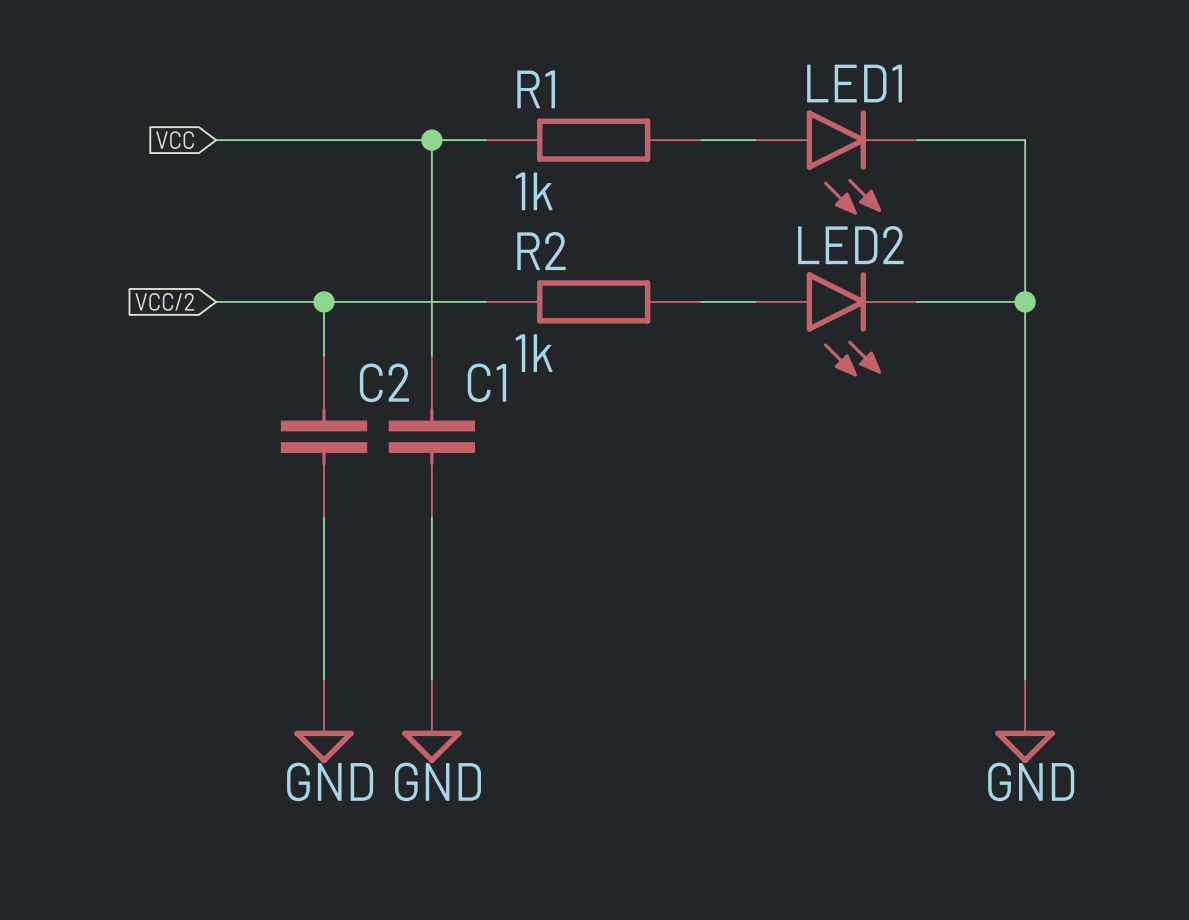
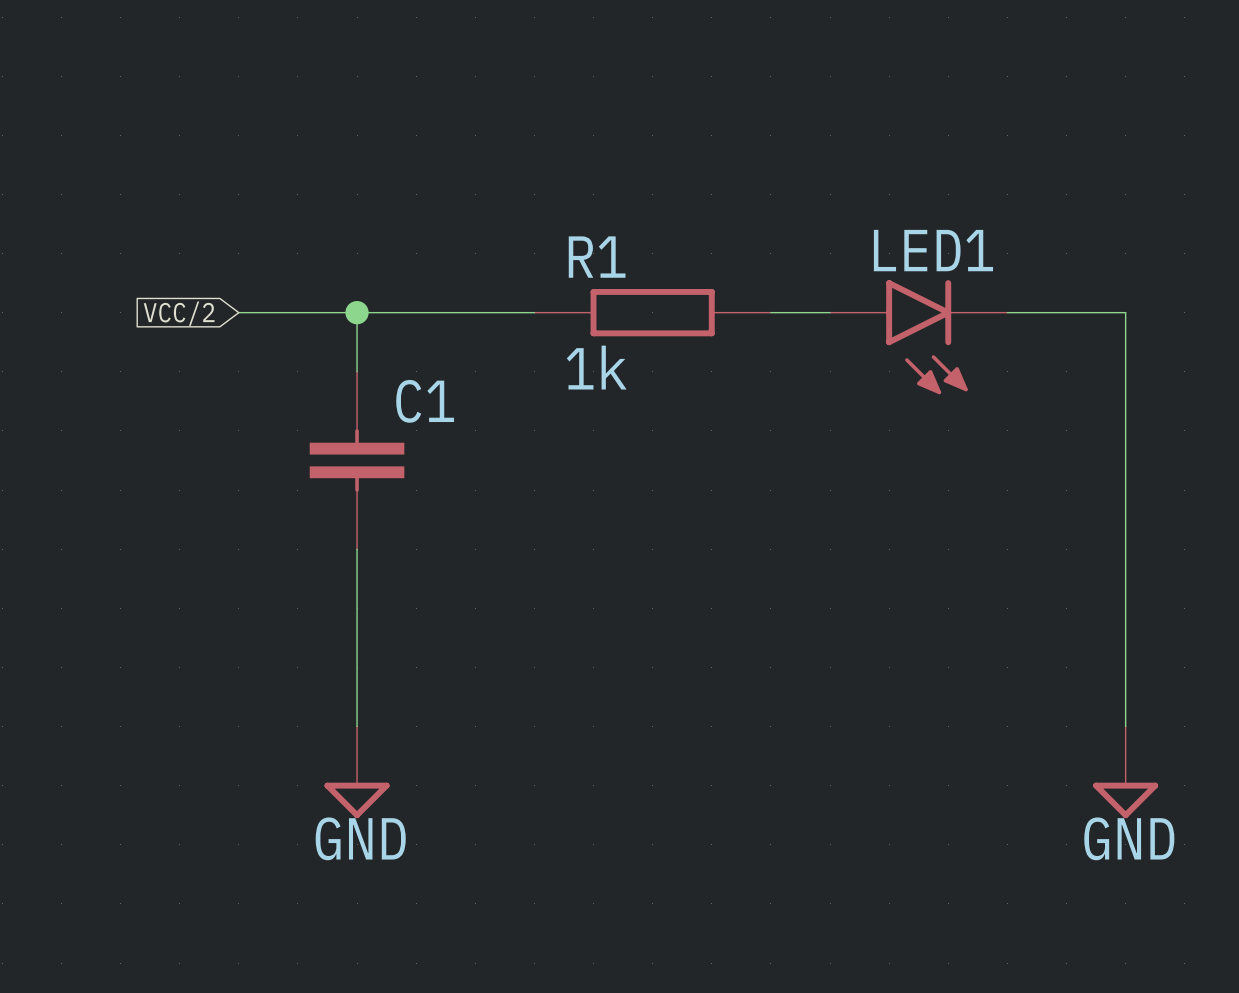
global label: VCC (175, 140) -> none
wire: (216, 140) (485, 140) -> none
wire: (431, 140) (431, 355) -> none
junction: (431, 140) -> none
R1: 1k (593, 140) -> none
wire: (701, 140) (755, 140) -> none
wire: (917, 140) (1025, 140) (1025, 301) -> none
LED1: (836, 162) -> none
LED2 name: LED2 (850, 245) -> LED1 (933, 250)
R2 name: R2 (541, 251) -> R1 (597, 257)
junction: (1025, 301) -> none
C2 name: C2 (384, 382) -> C1 (425, 401)
C1: (431, 436) -> none
wire: (431, 517) (431, 679) -> none
power symbol: GND (431, 721) -> none

